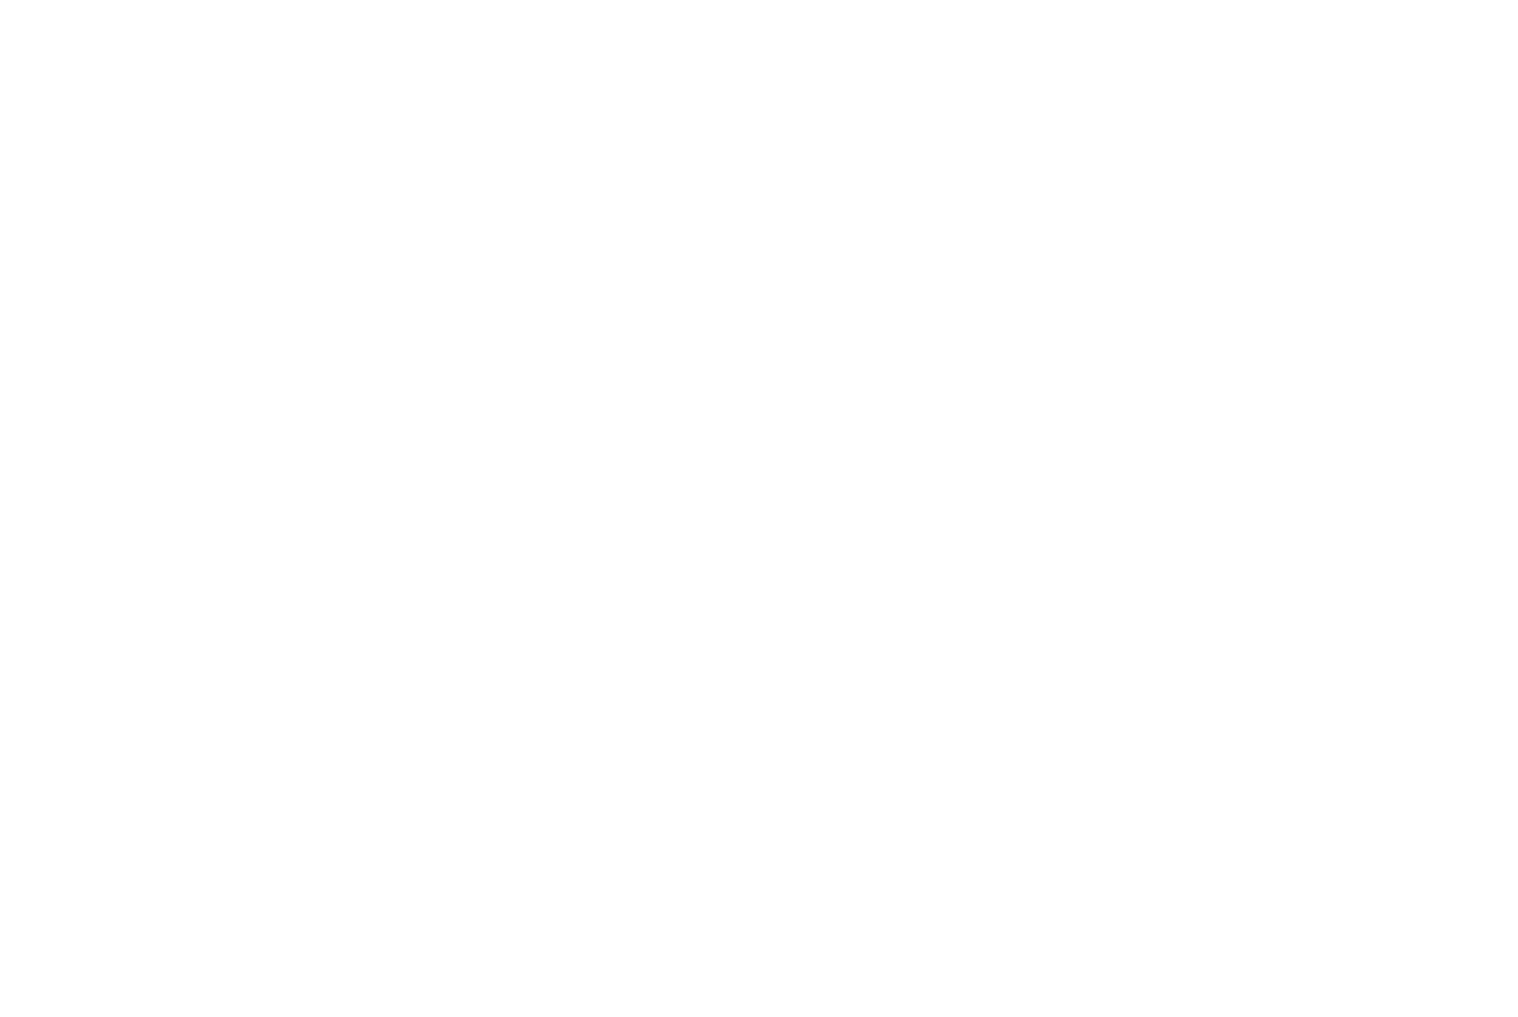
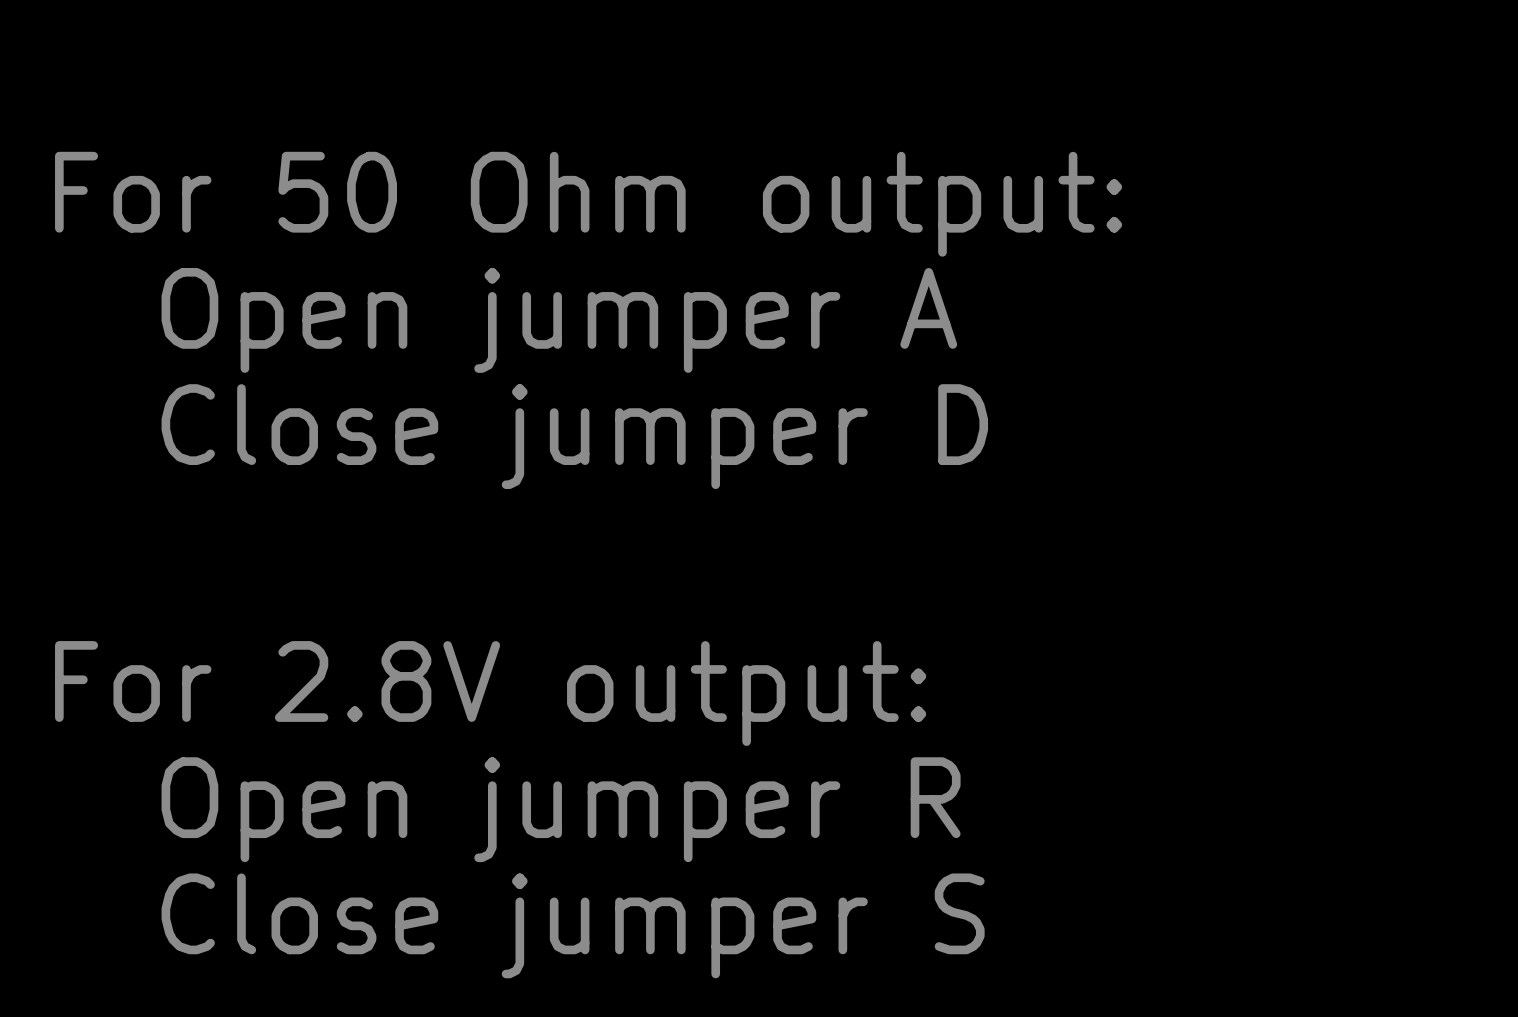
text: none -> For 50 Ohm output: (588, 204)
text: none -> Open jumper A (559, 320)
text: none -> Close jumper D (574, 436)
text: none -> For 2.8V output: (490, 693)
text: none -> Open jumper R (561, 809)
text: none -> Close jumper S (573, 925)

